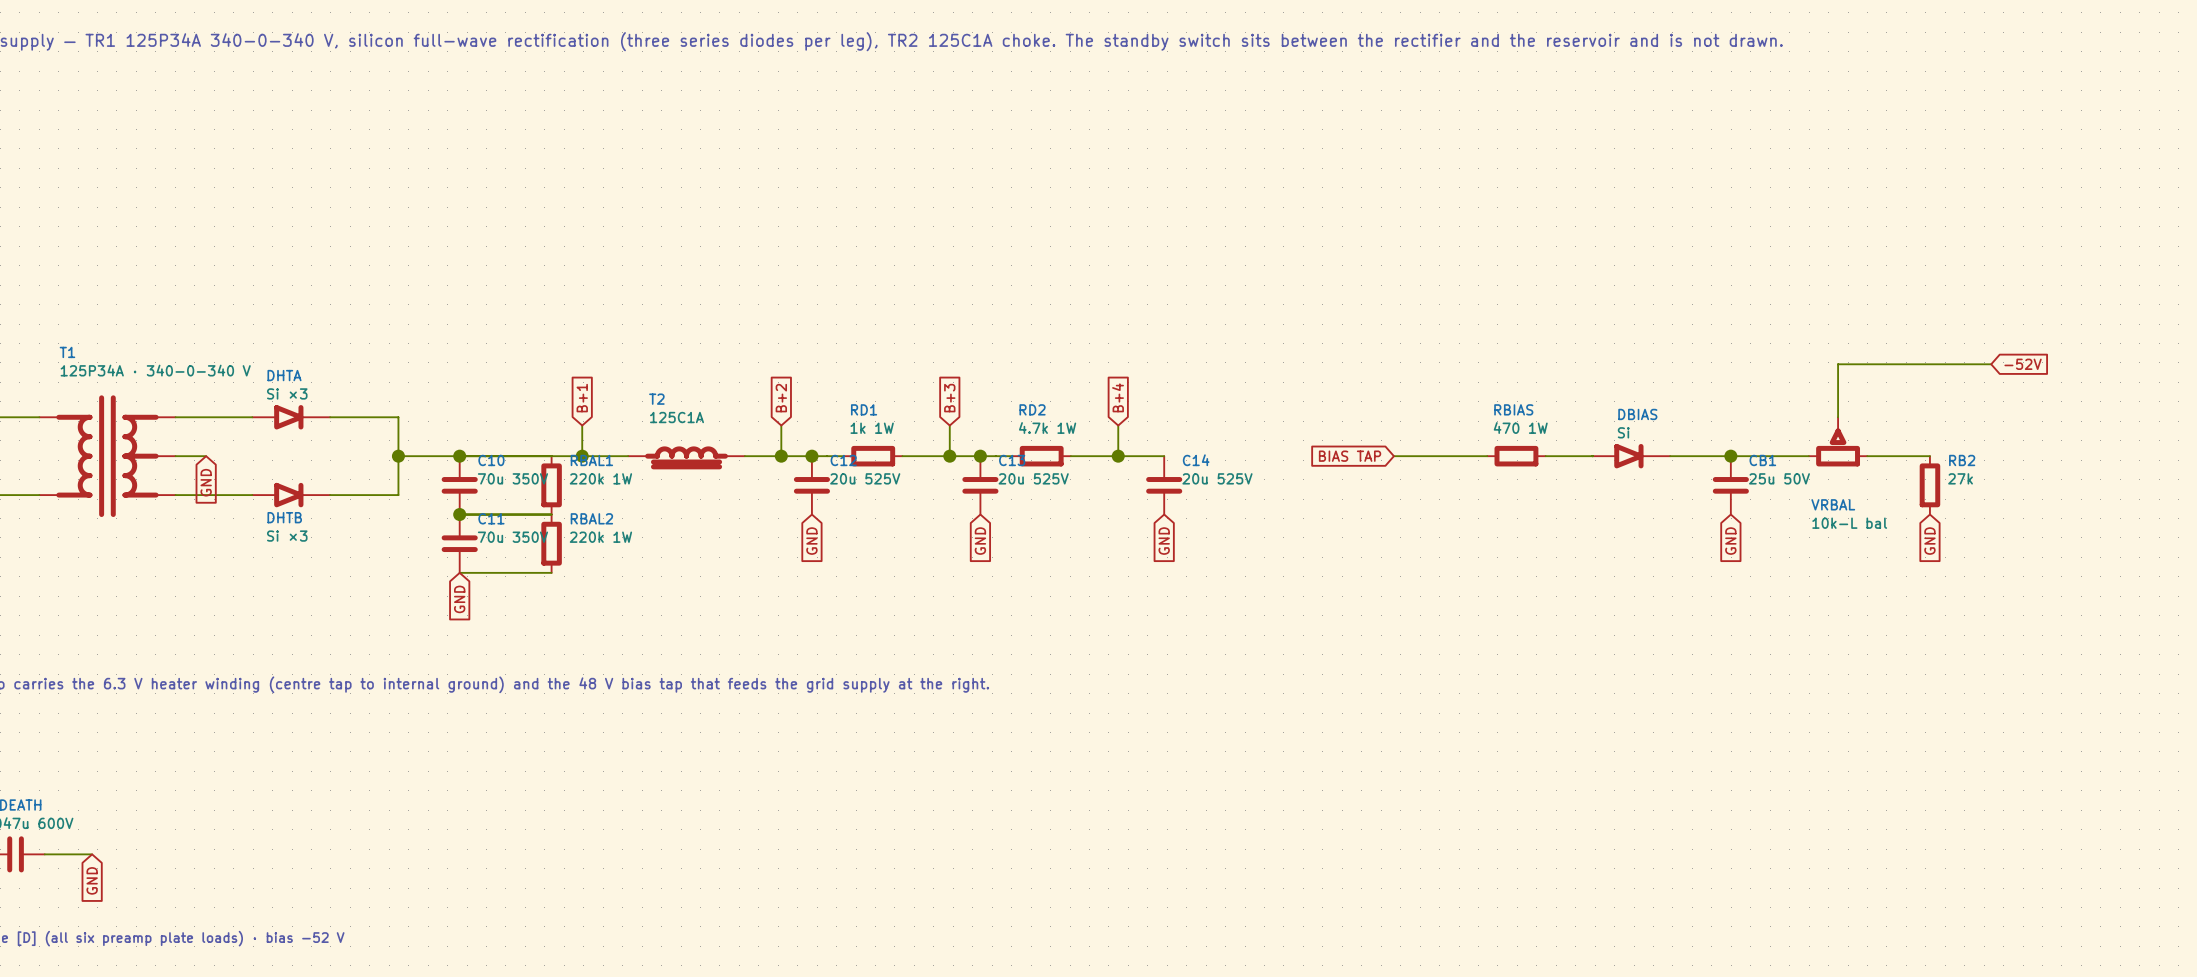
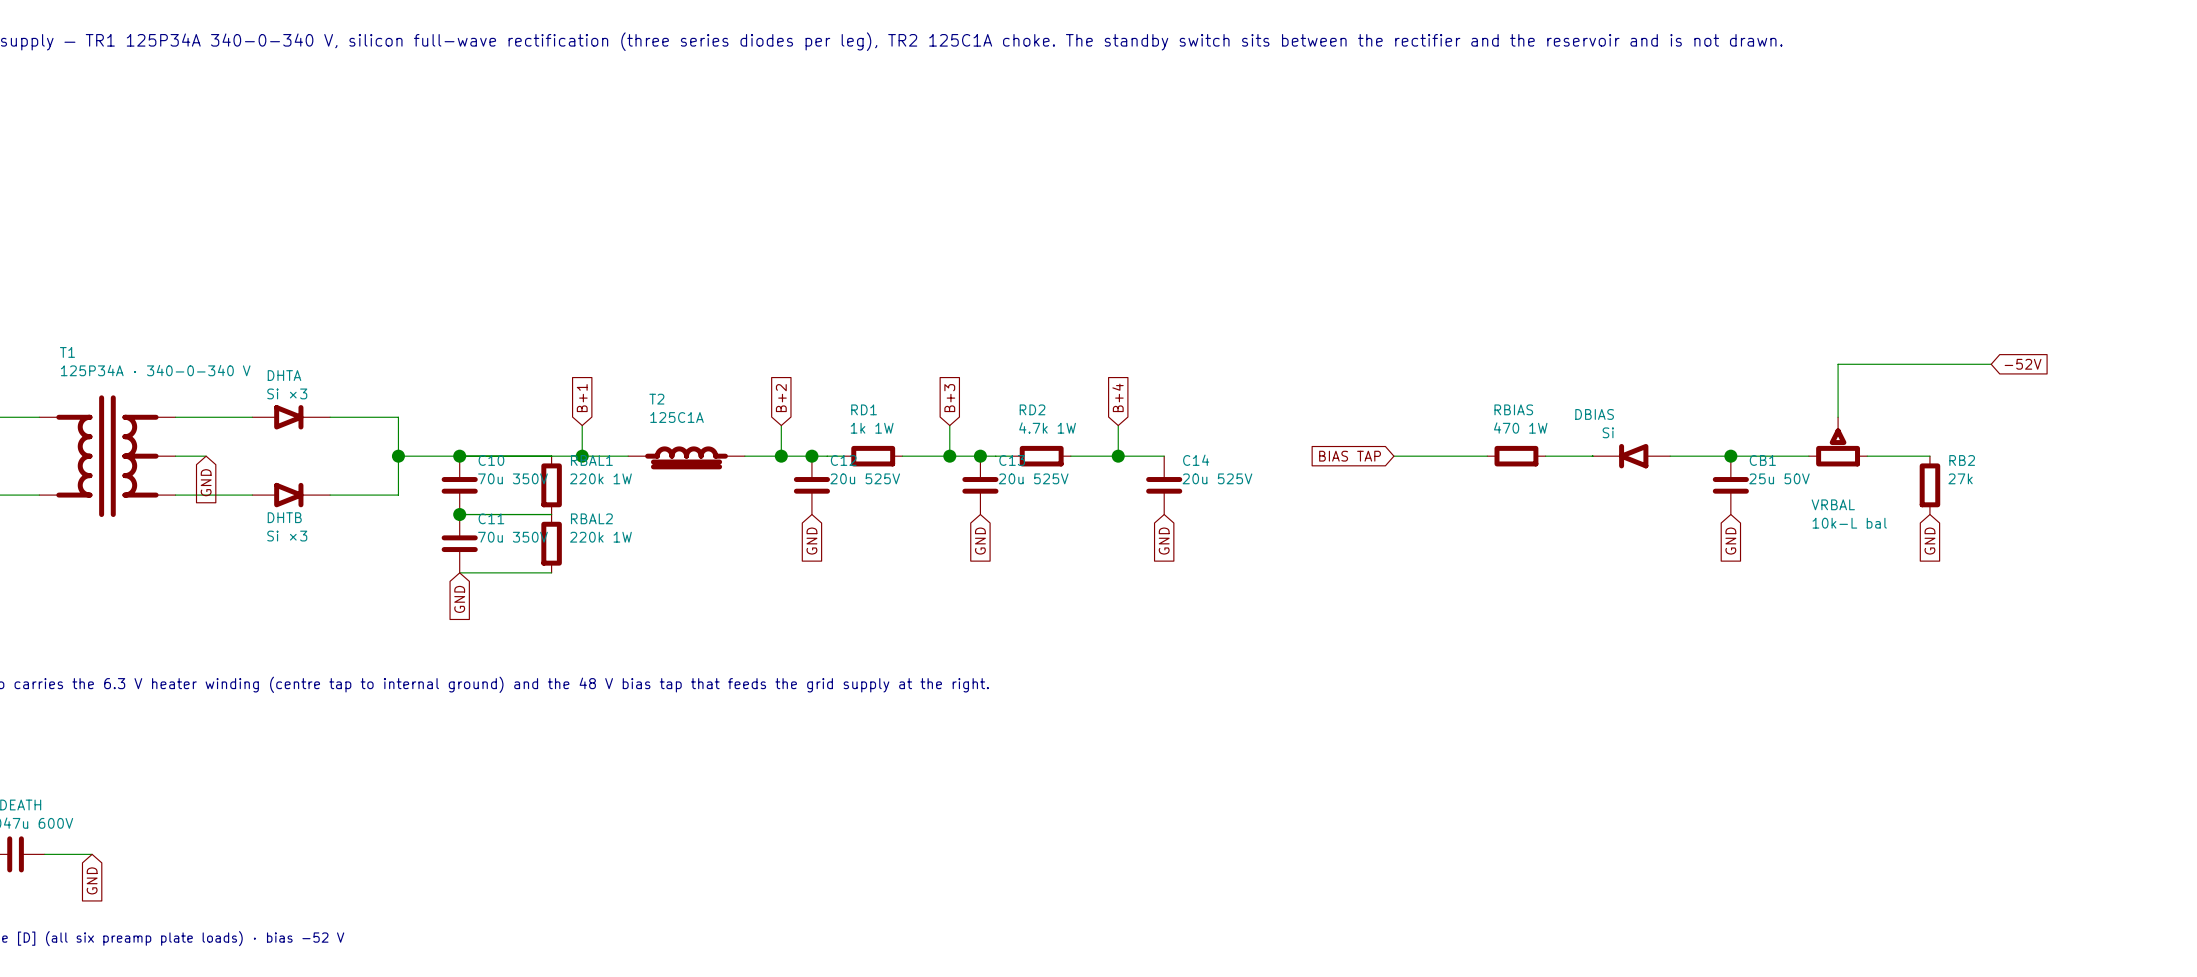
DBIAS name position: DBIAS (1637, 414) -> DBIAS (1594, 414)
DBIAS value position: Si (1623, 432) -> Si (1608, 432)
DBIAS rotation: 0° (1628, 456) -> 180° (1633, 456)

